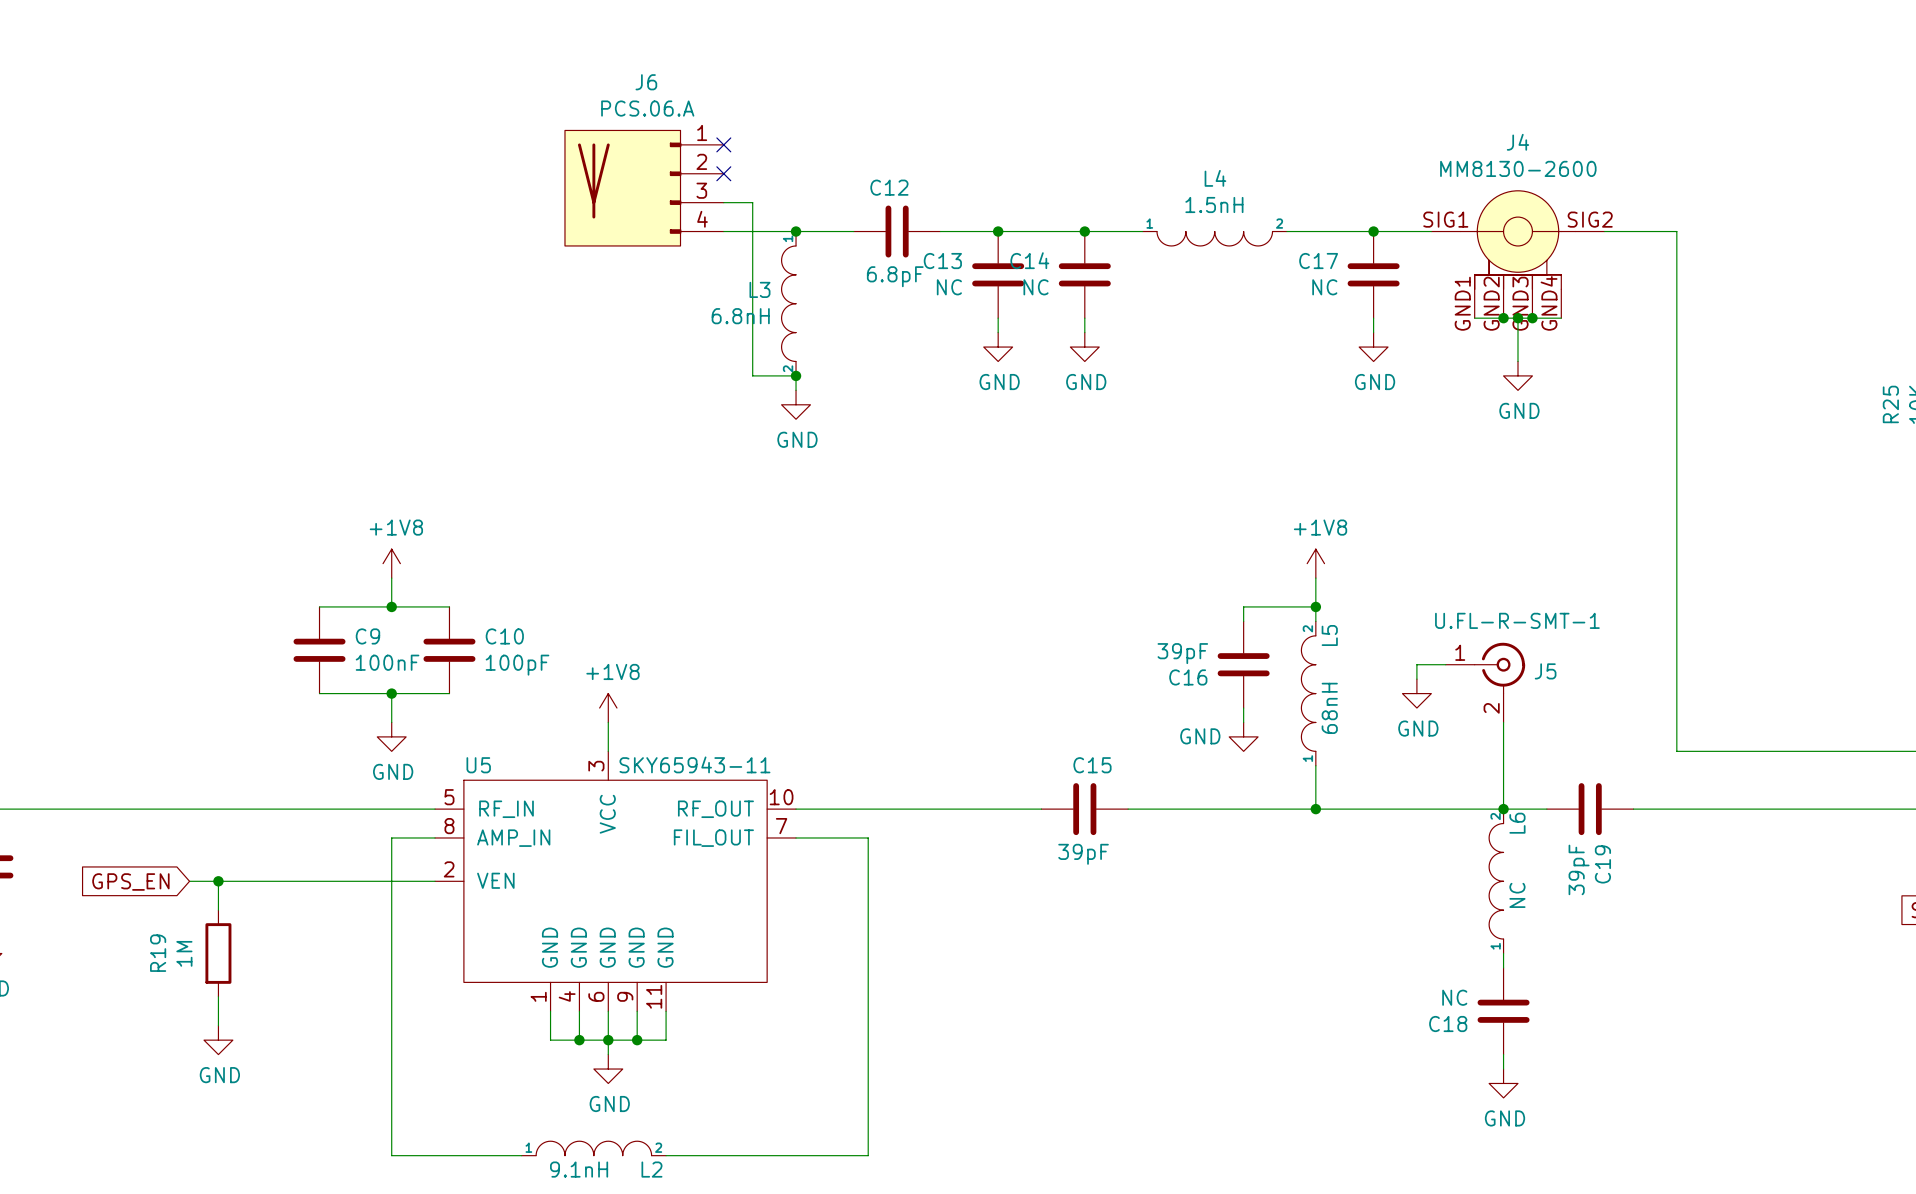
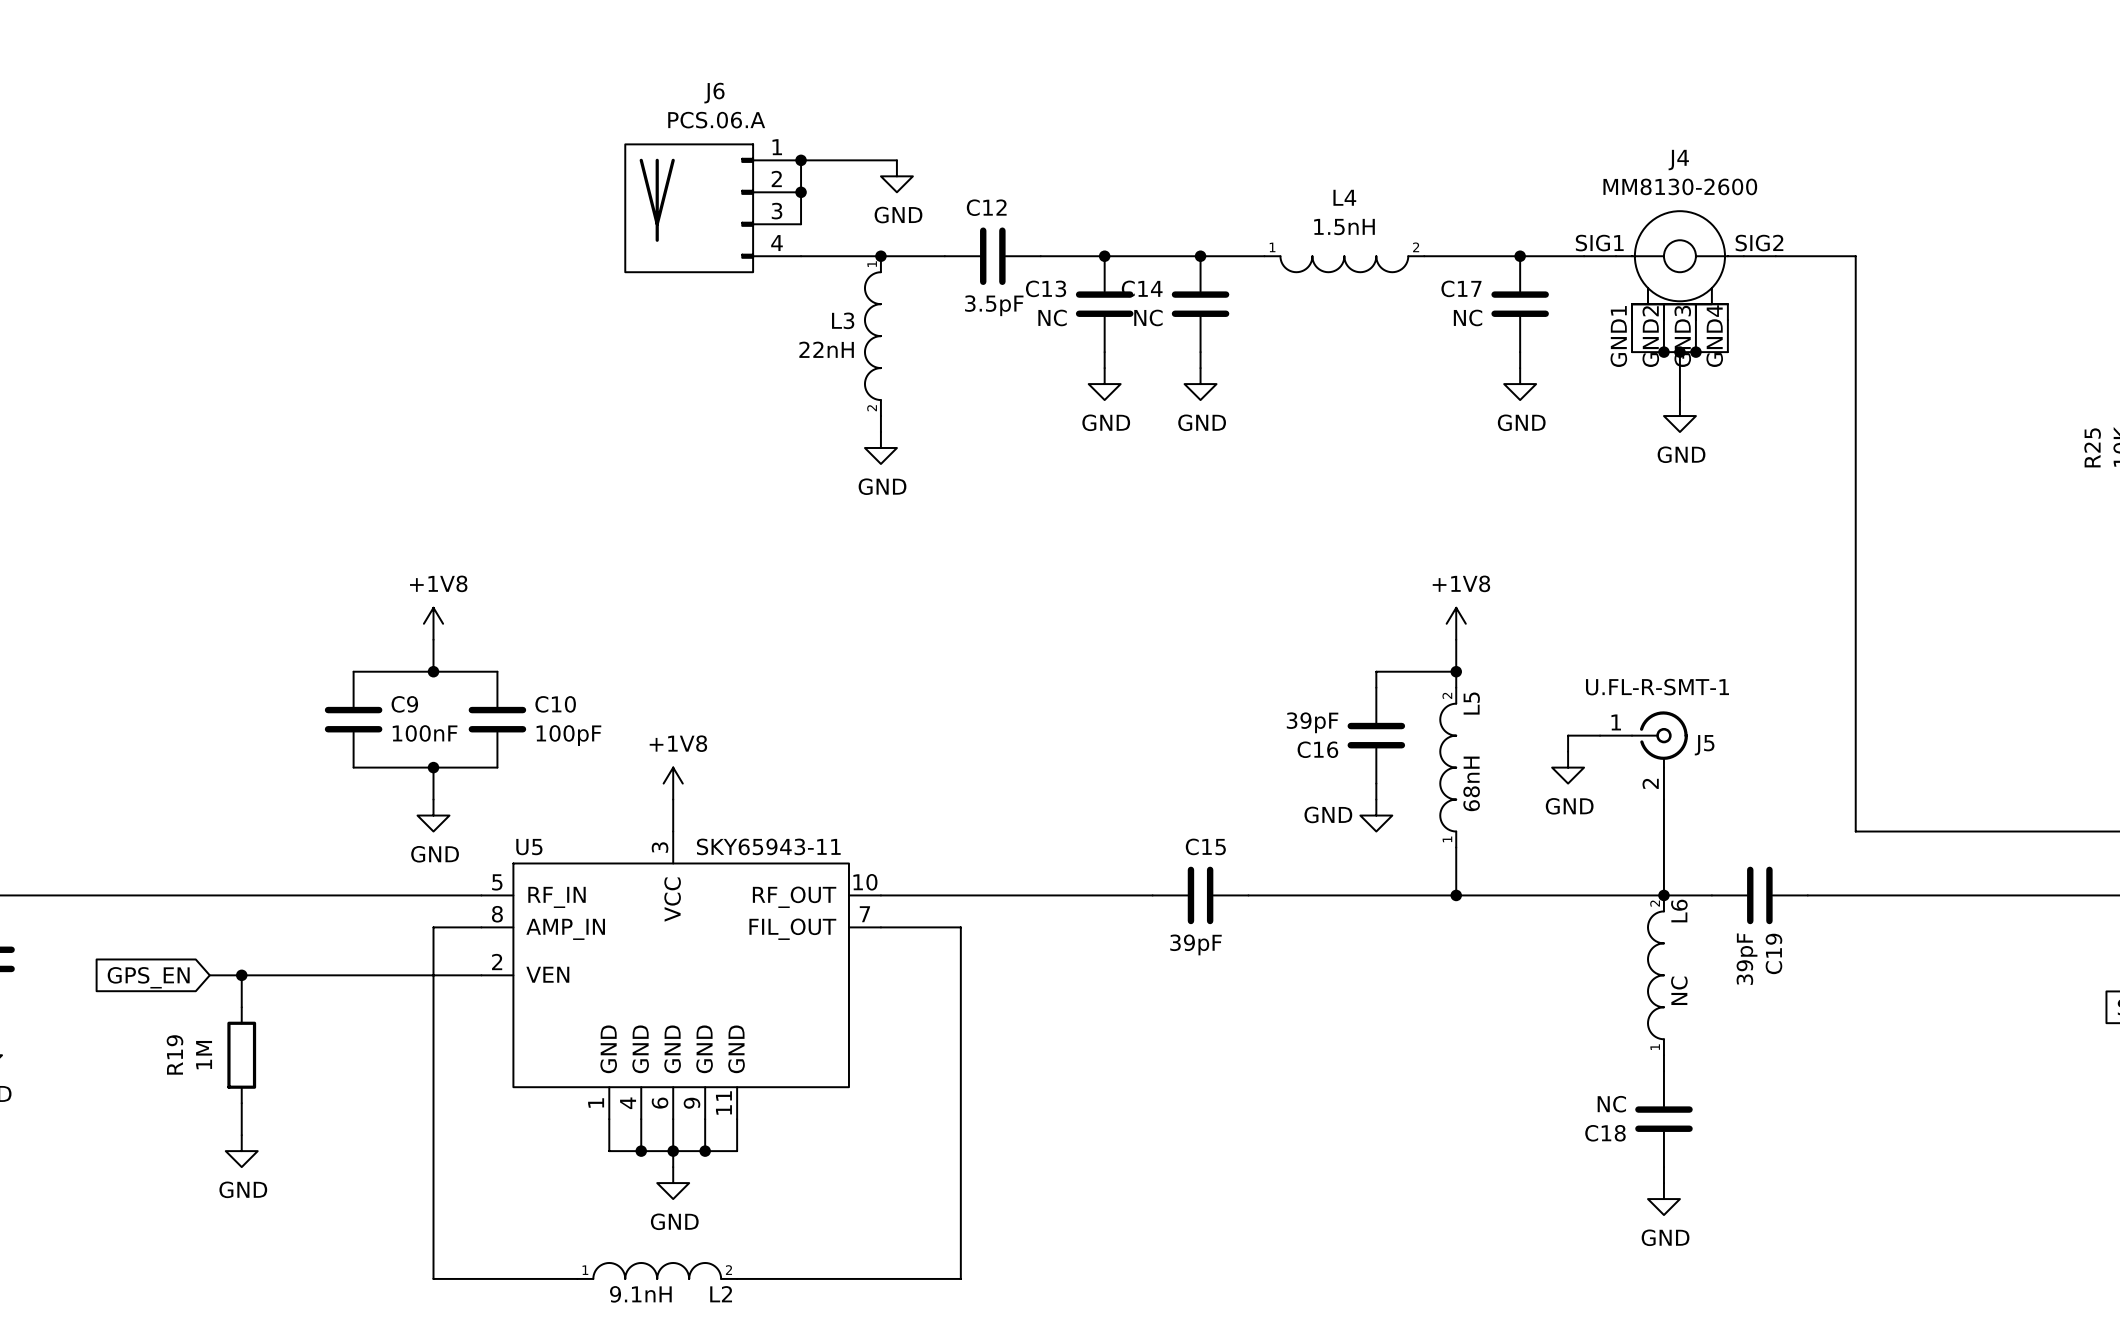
junction: none -> (801, 160)
no-connect mark: (723, 144) -> none
power symbol: none -> GND (896, 176)
junction: none -> (801, 192)
no-connect mark: (723, 173) -> none
wire: (723, 202) (752, 202) (752, 375) (796, 375) -> (801, 224) (801, 160) (896, 160)
C12 value: 6.8pF (895, 276) -> 3.5pF (994, 305)
L3 value: 6.8nH (740, 316) -> 22nH (826, 349)
junction: (796, 375) -> none

